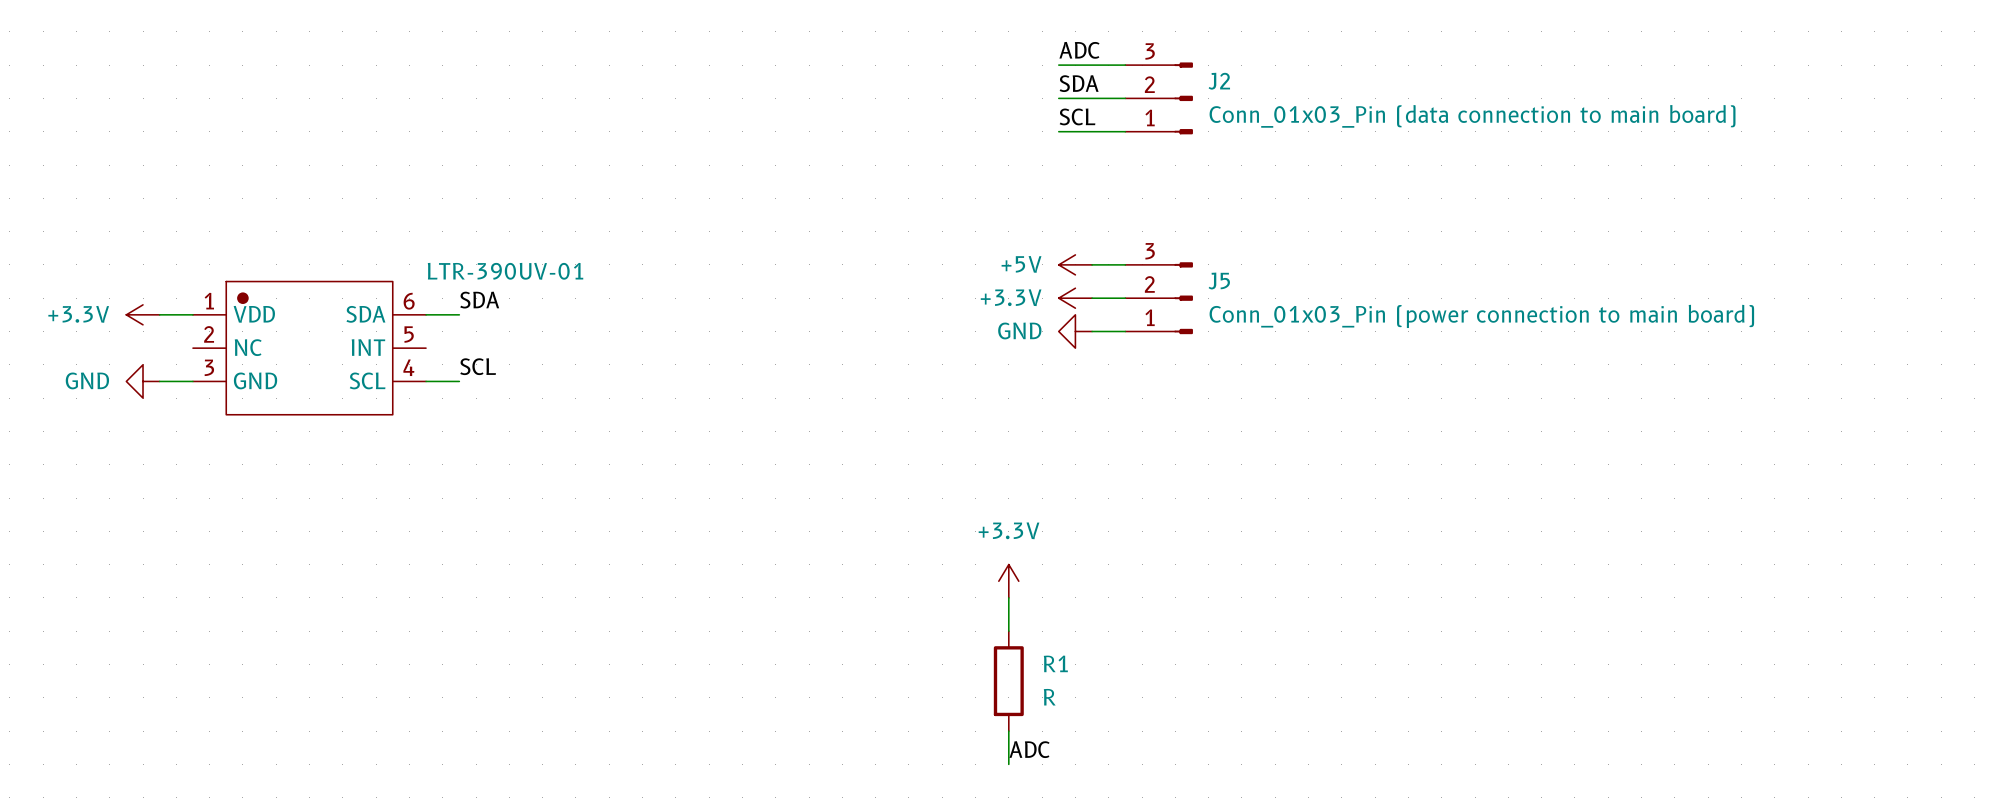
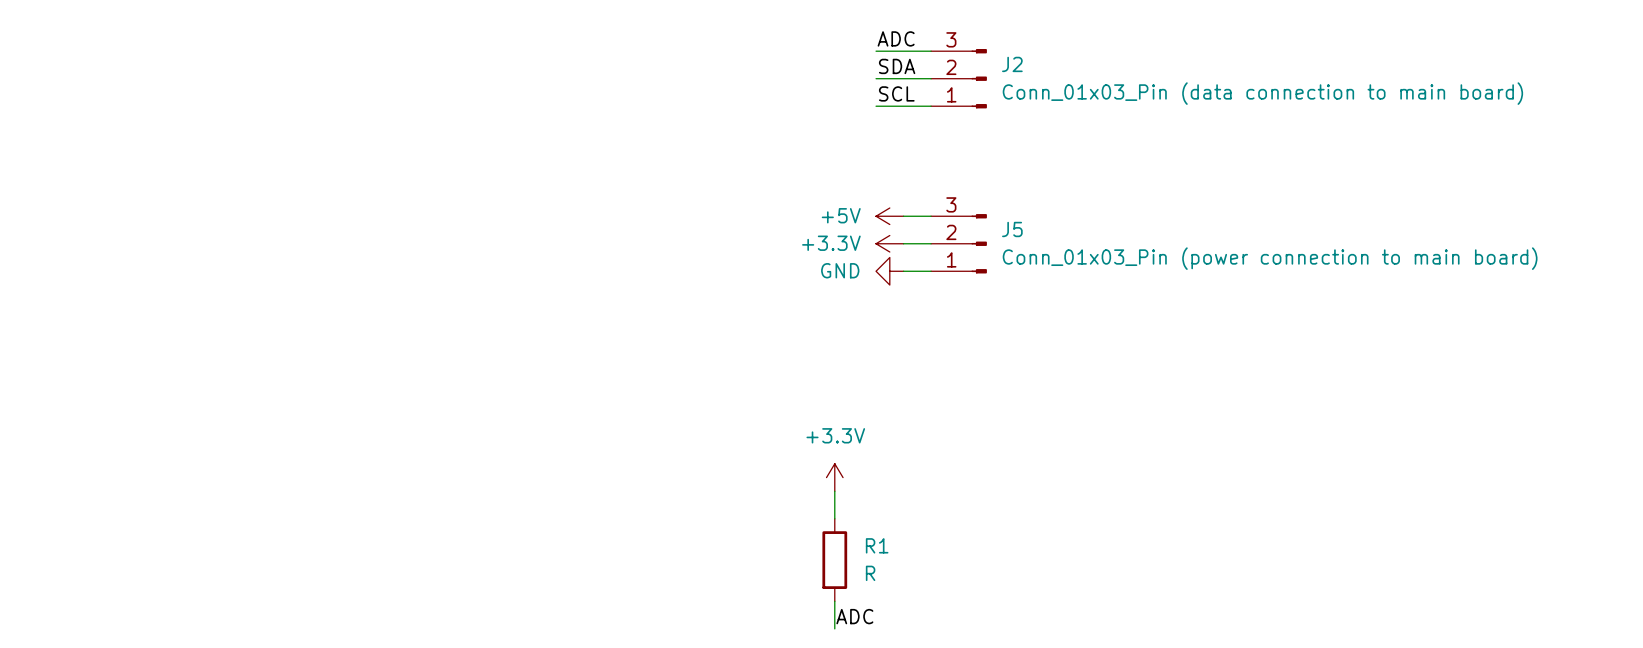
label: SDA (479, 300) -> none
power symbol: +3.3V (143, 314) -> none
wire: (159, 314) (192, 314) -> none
wire: (426, 314) (459, 314) -> none
LTR-390UV-01: (309, 348) -> none
label: SCL (478, 366) -> none
power symbol: GND (143, 381) -> none
wire: (159, 381) (192, 381) -> none
wire: (426, 381) (459, 381) -> none

